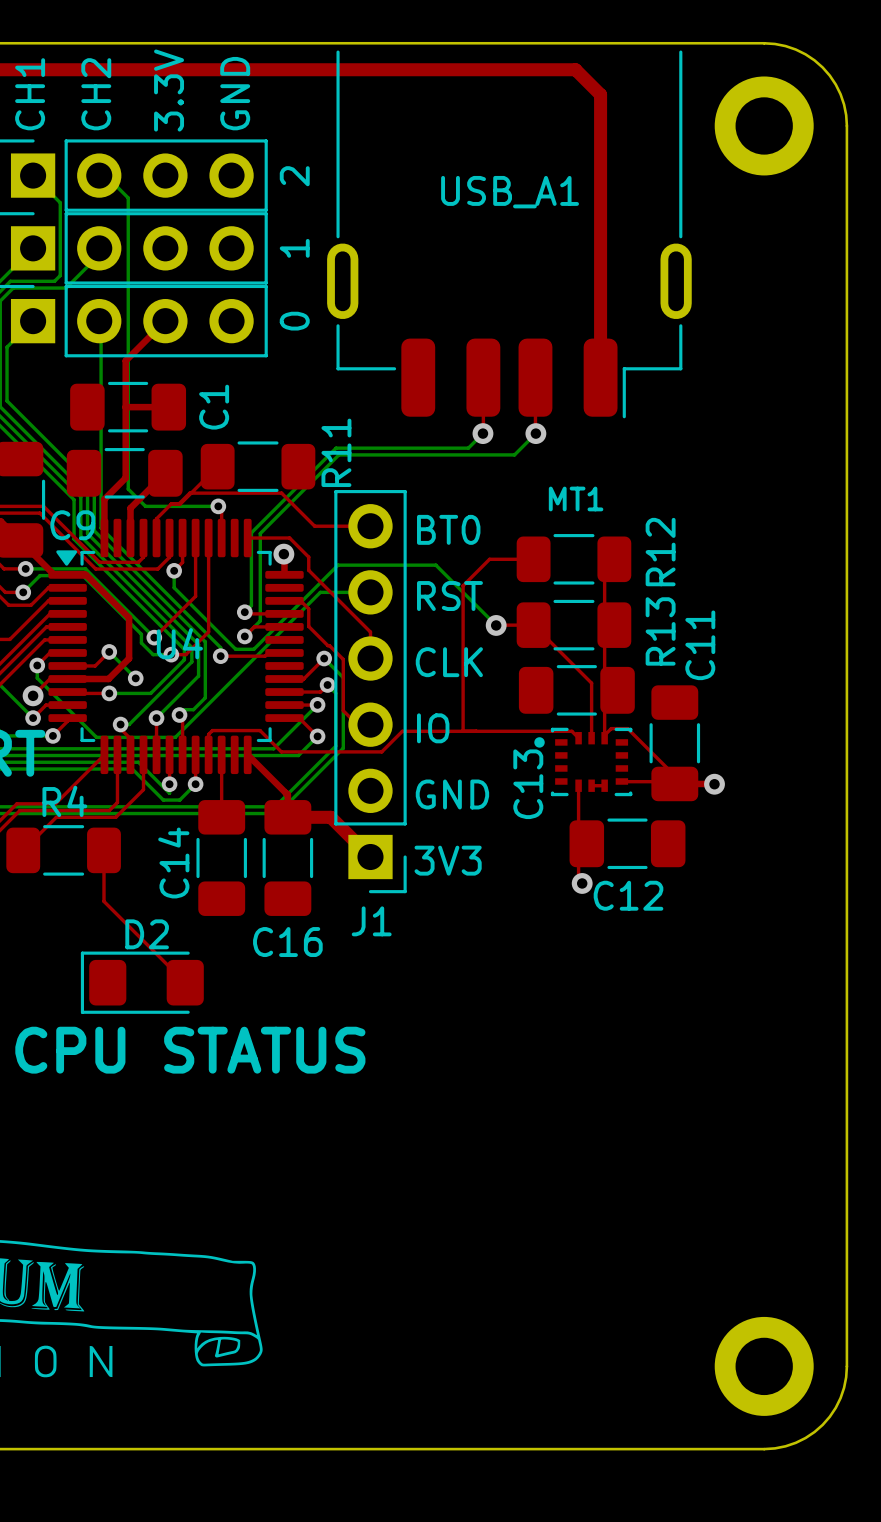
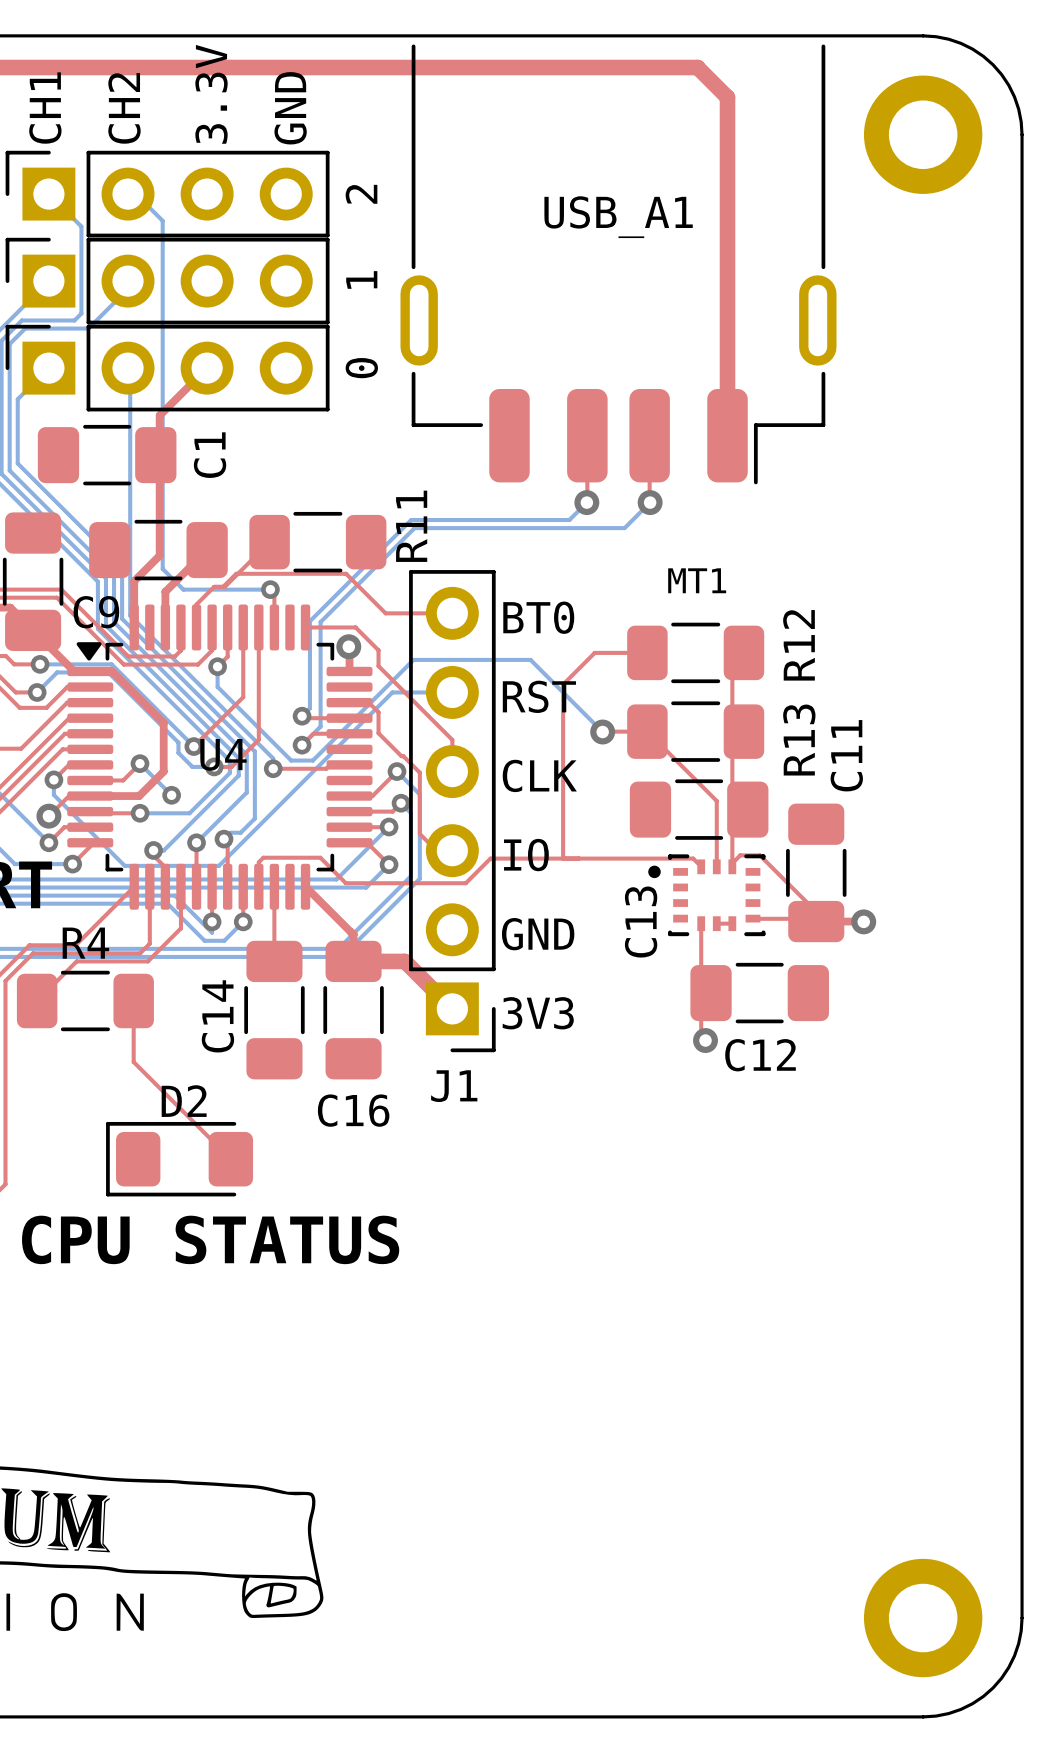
top track: (125, 407) (168, 407) -> none
C1 position: (128, 407) -> (107, 455)

